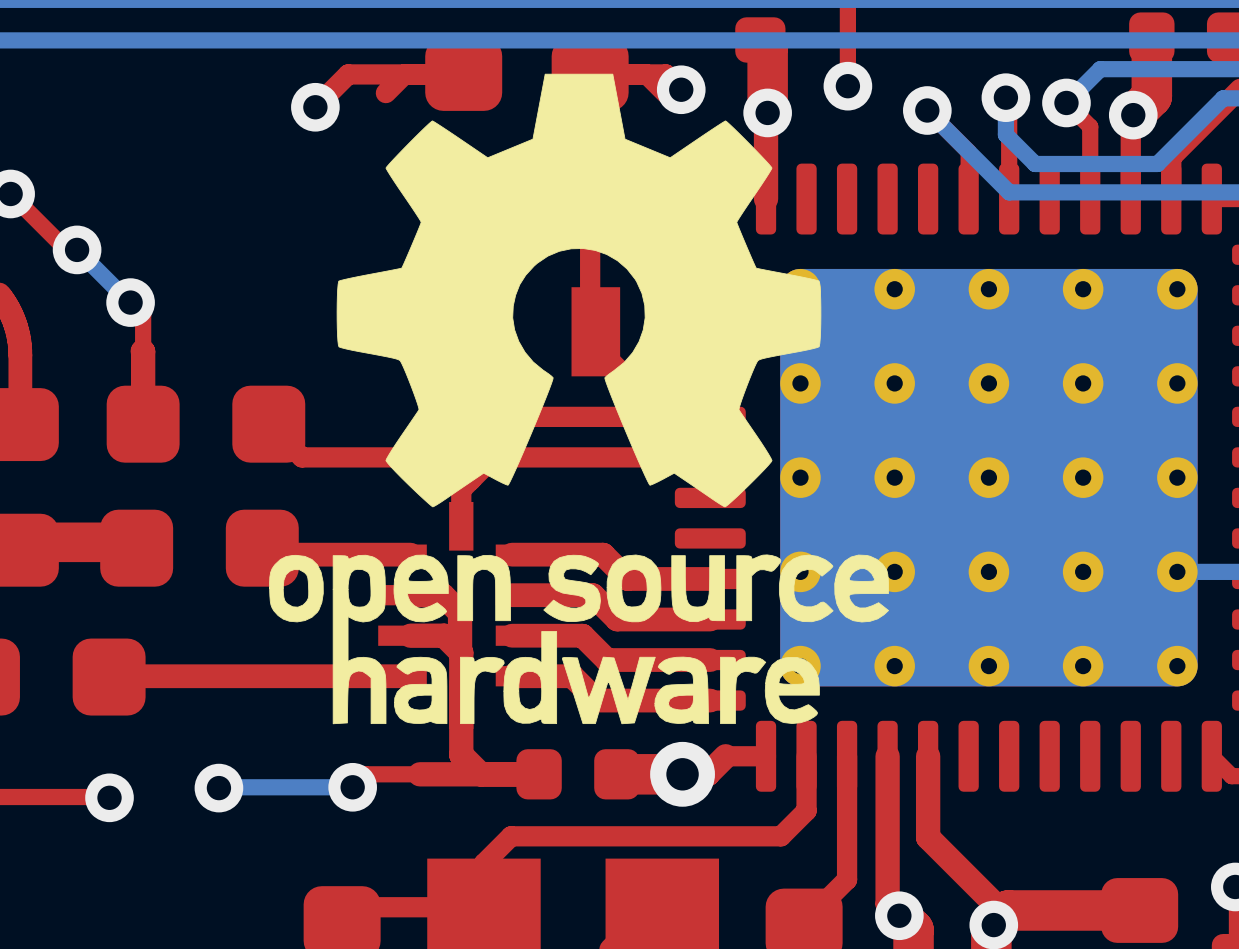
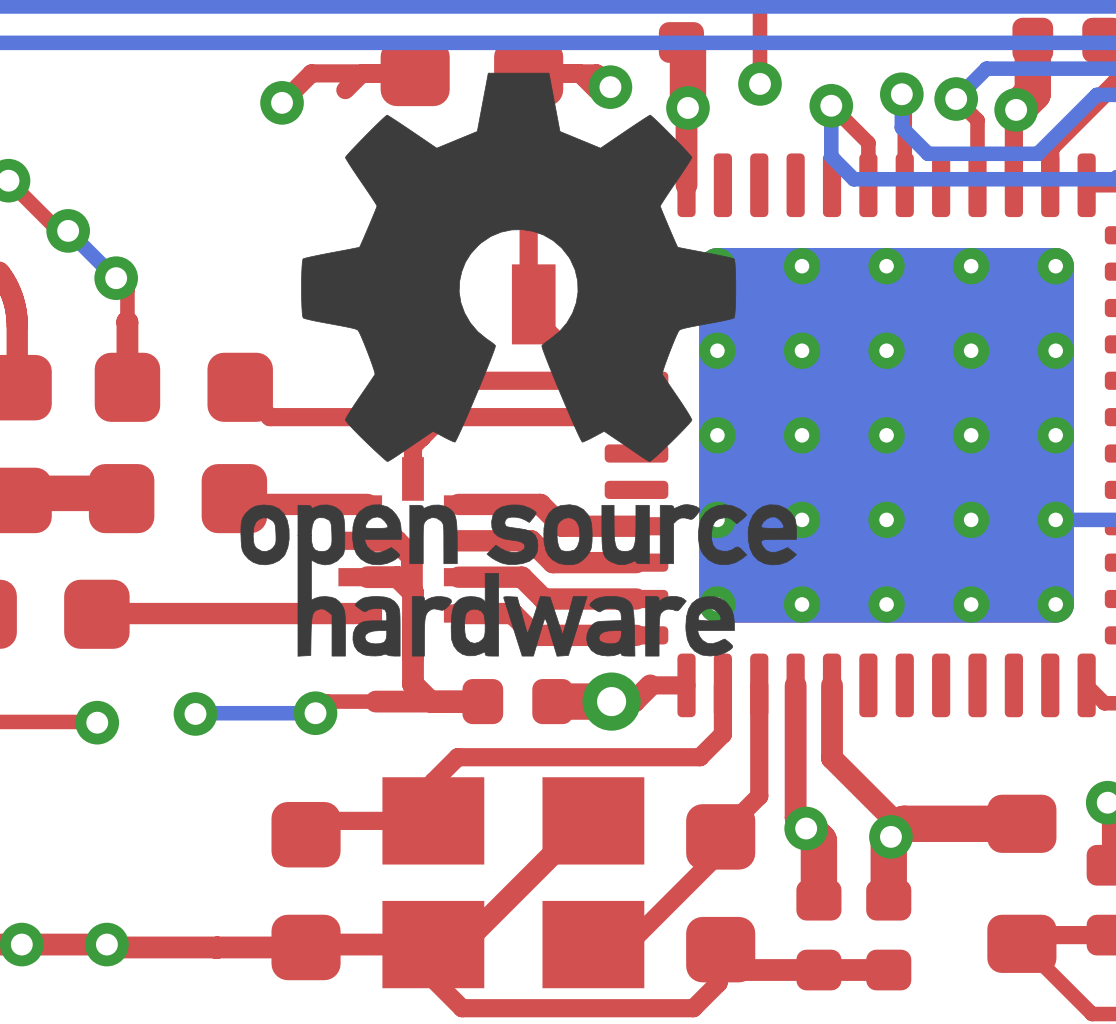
bottom track: (927, 110) (1009, 192) -> (831, 105) (831, 156) (853, 179) (904, 179)

